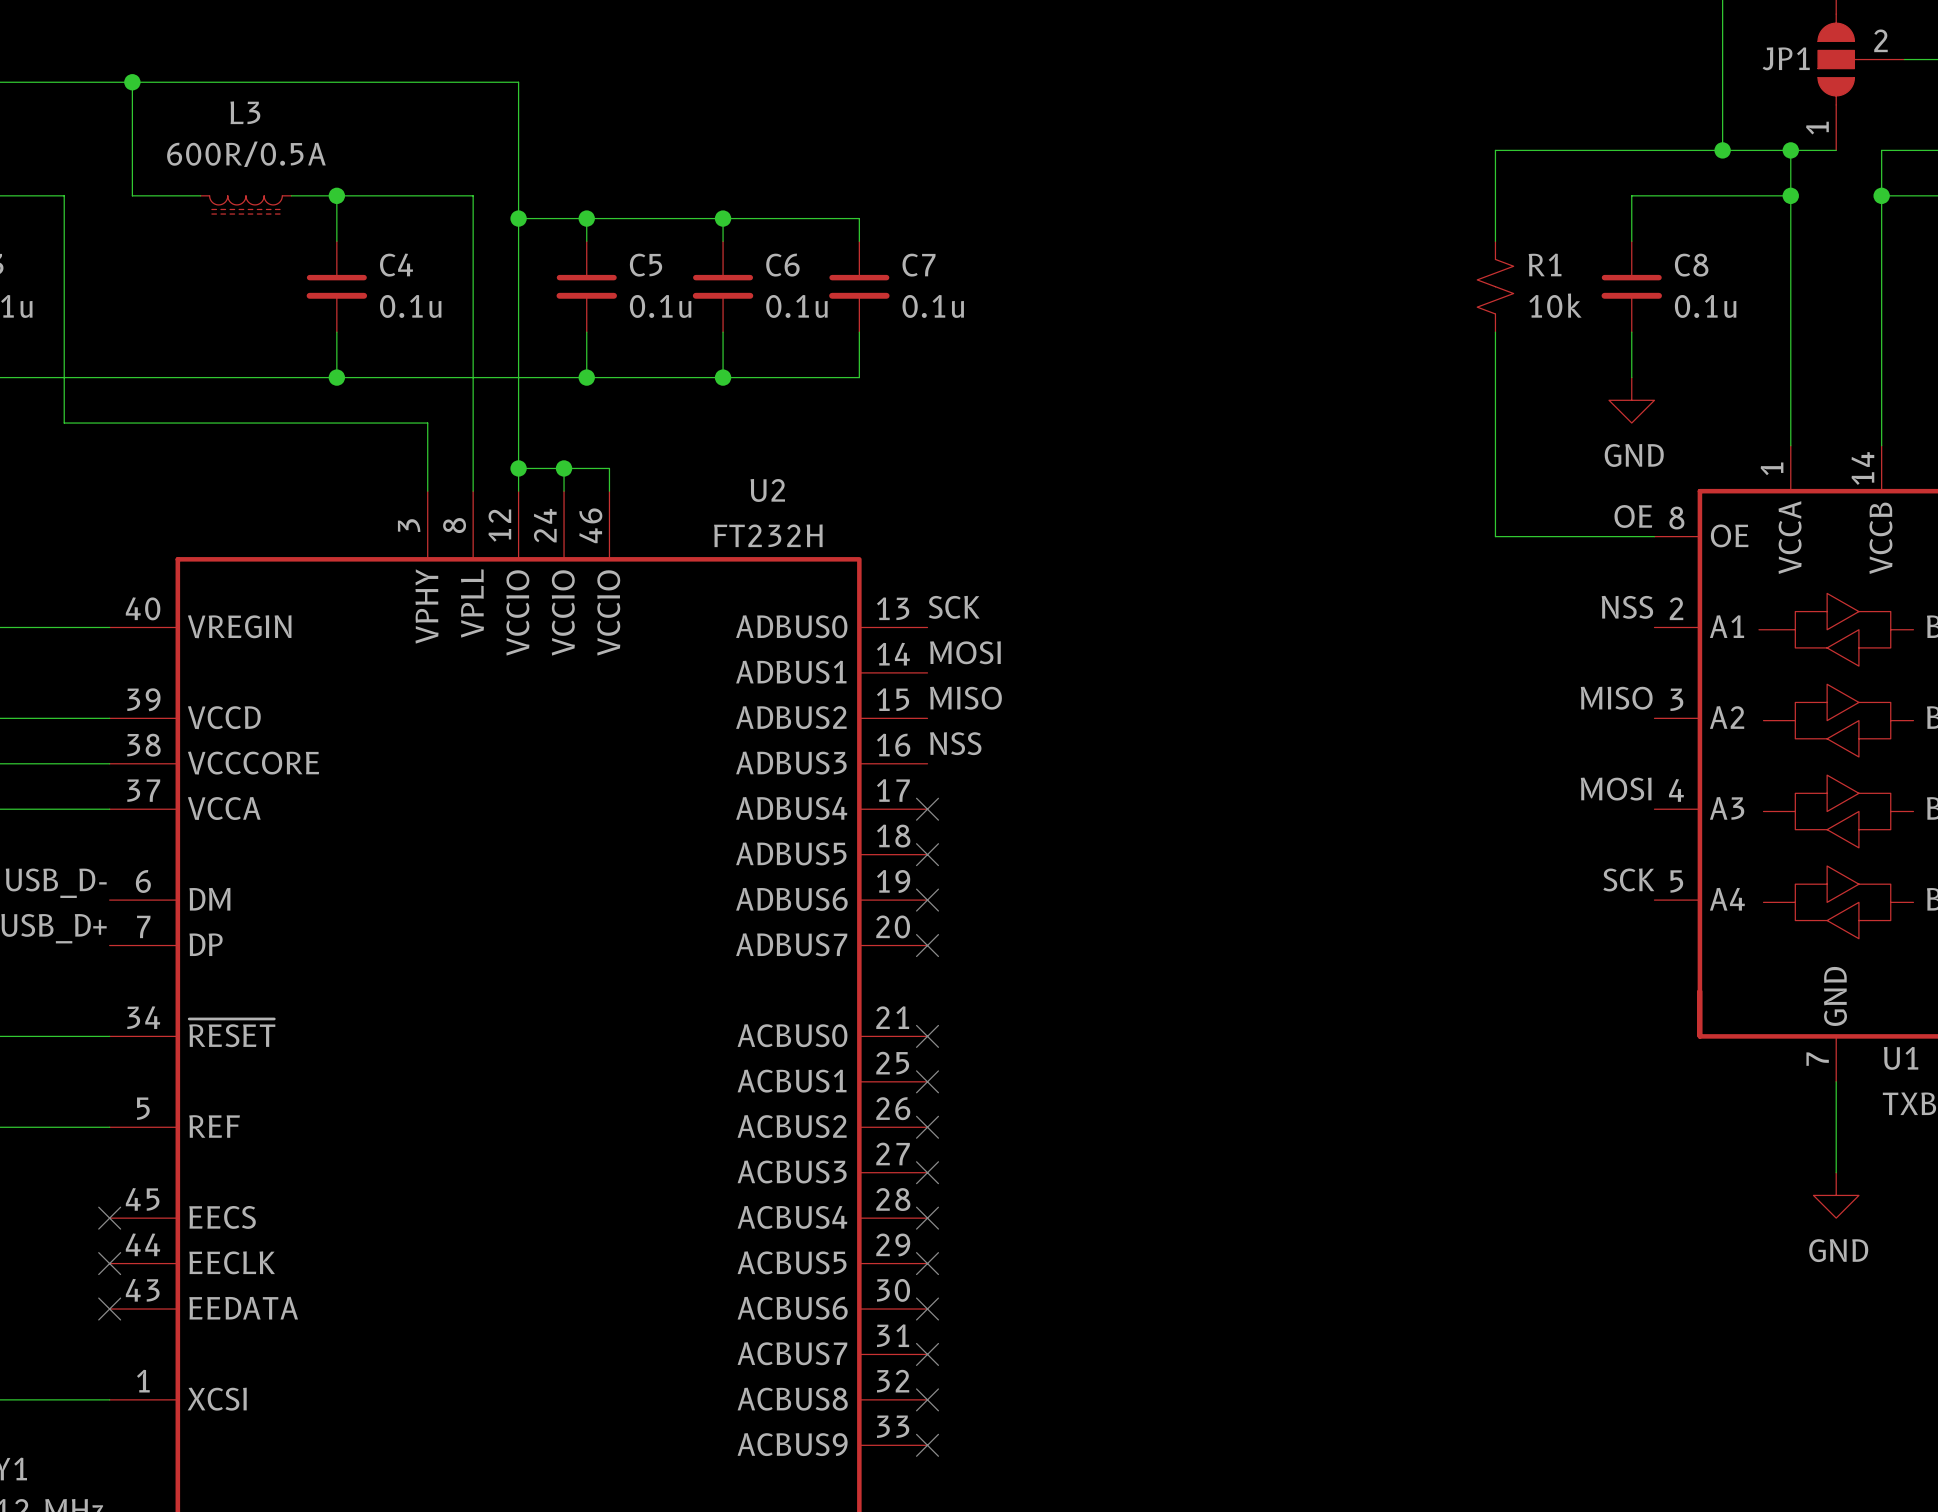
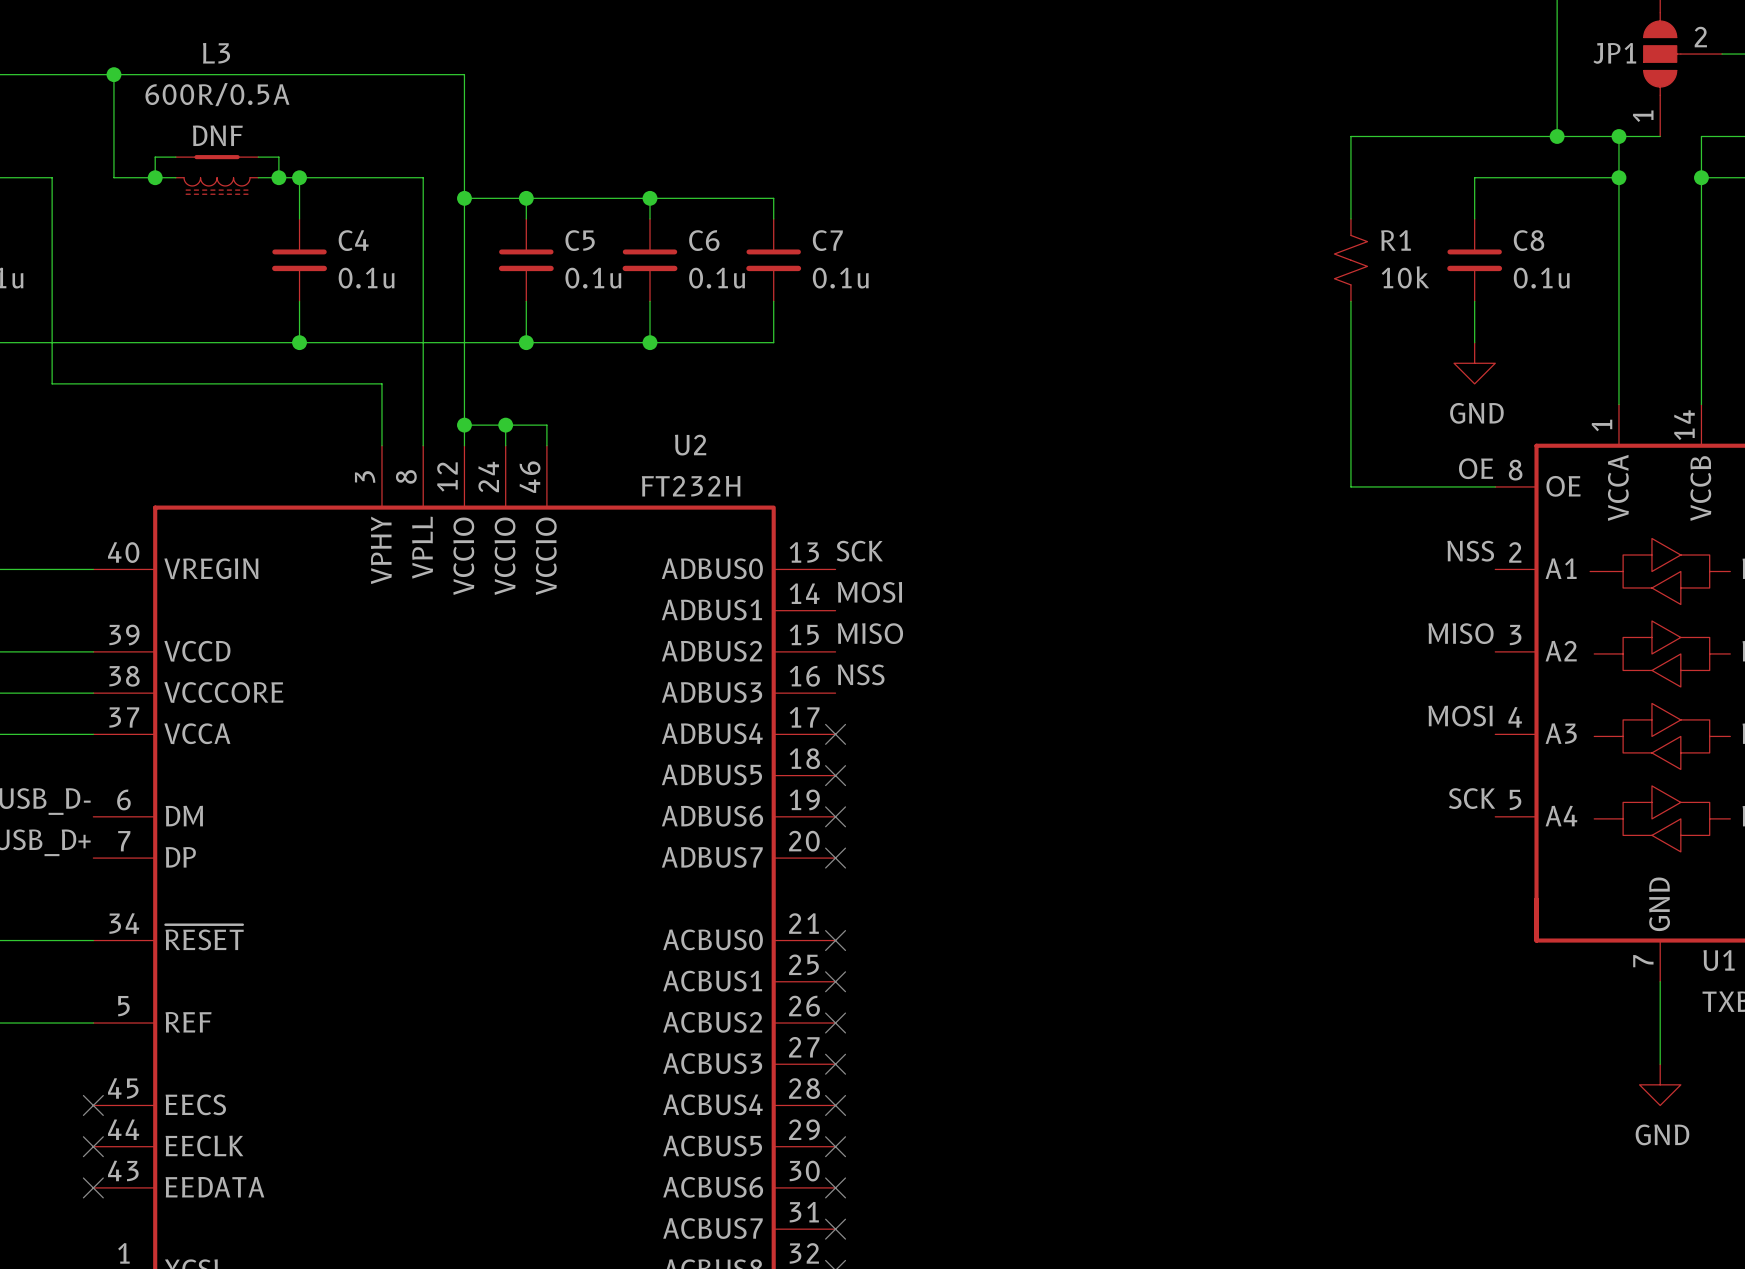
L3 name position: L3 (245, 112) -> L3 (216, 53)
L3 text: none -> DNF (217, 135)
L3 value position: 600R/0.5A (246, 154) -> 600R/0.5A (217, 94)
wire: none -> (175, 157) (155, 157) (155, 177)
part: none -> (217, 157)
wire: none -> (258, 157) (278, 157) (278, 177)
junction: none -> (155, 177)
junction: none -> (278, 177)

